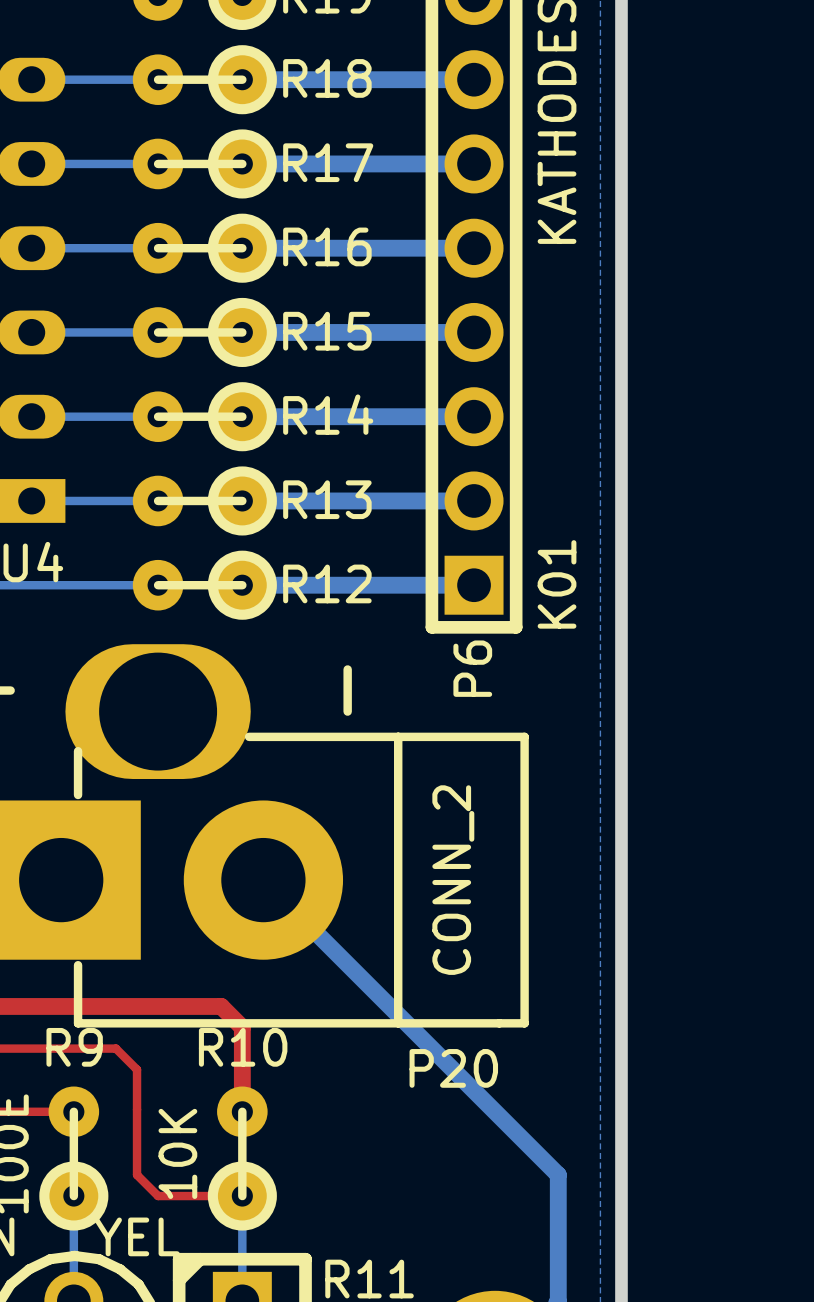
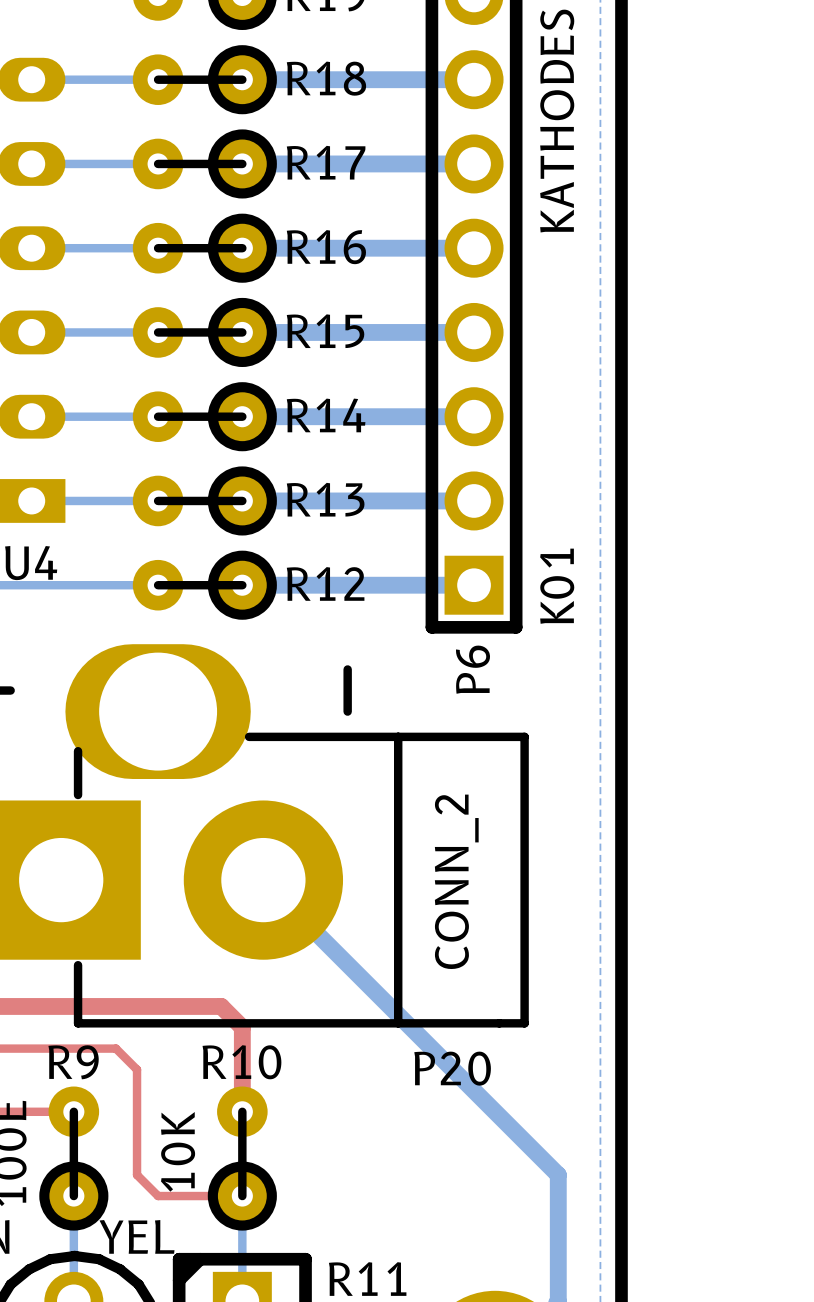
R9 name position: R9 (74, 1047) -> R9 (73, 1062)
R10 name position: R10 (243, 1047) -> R10 (241, 1062)

